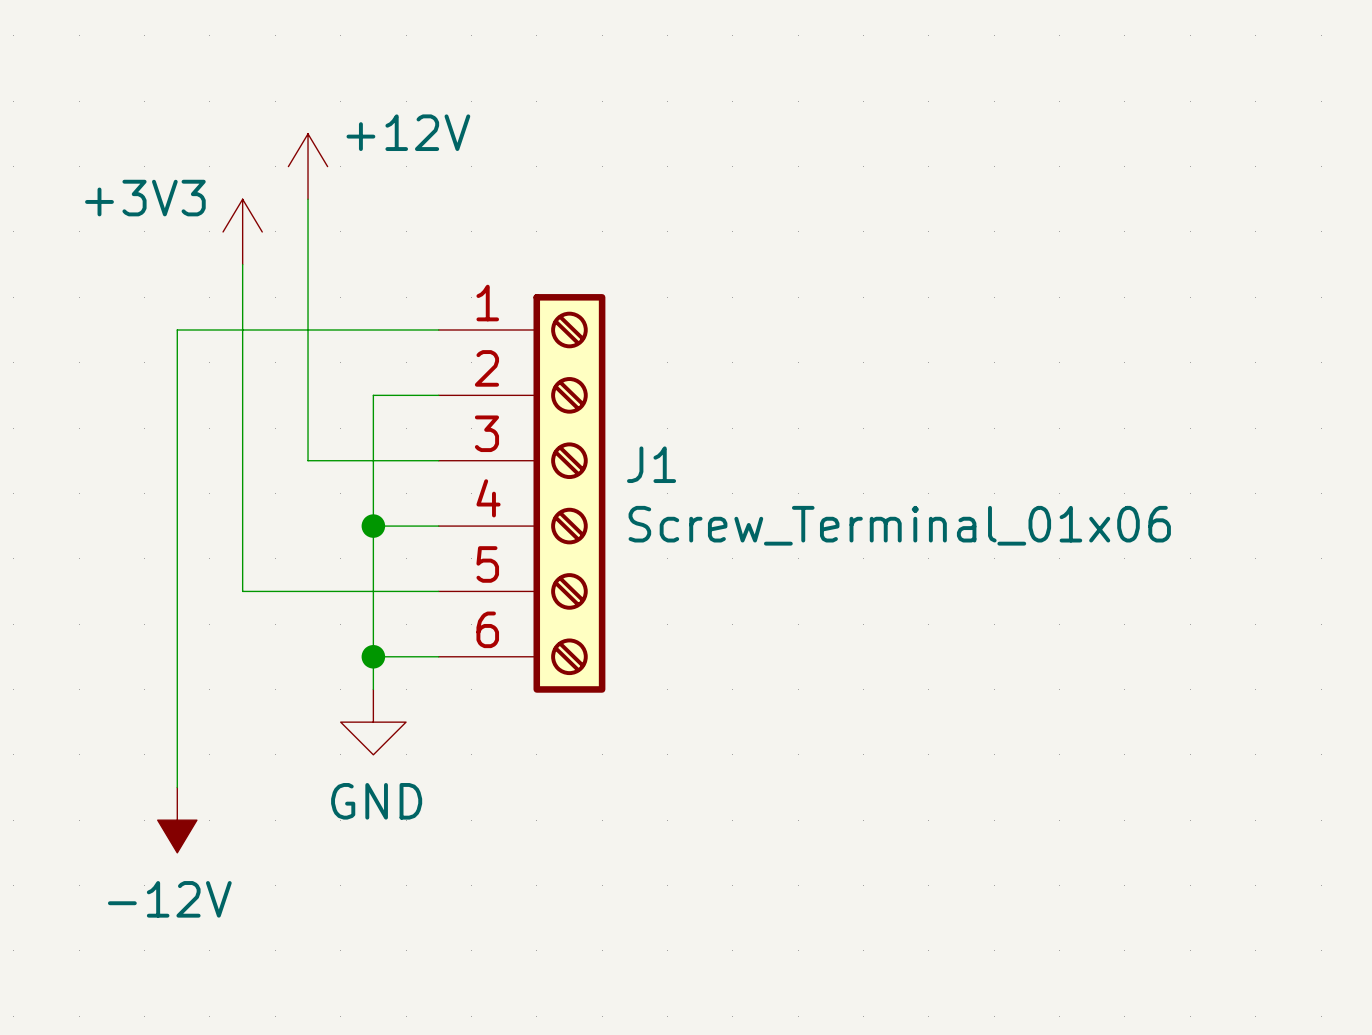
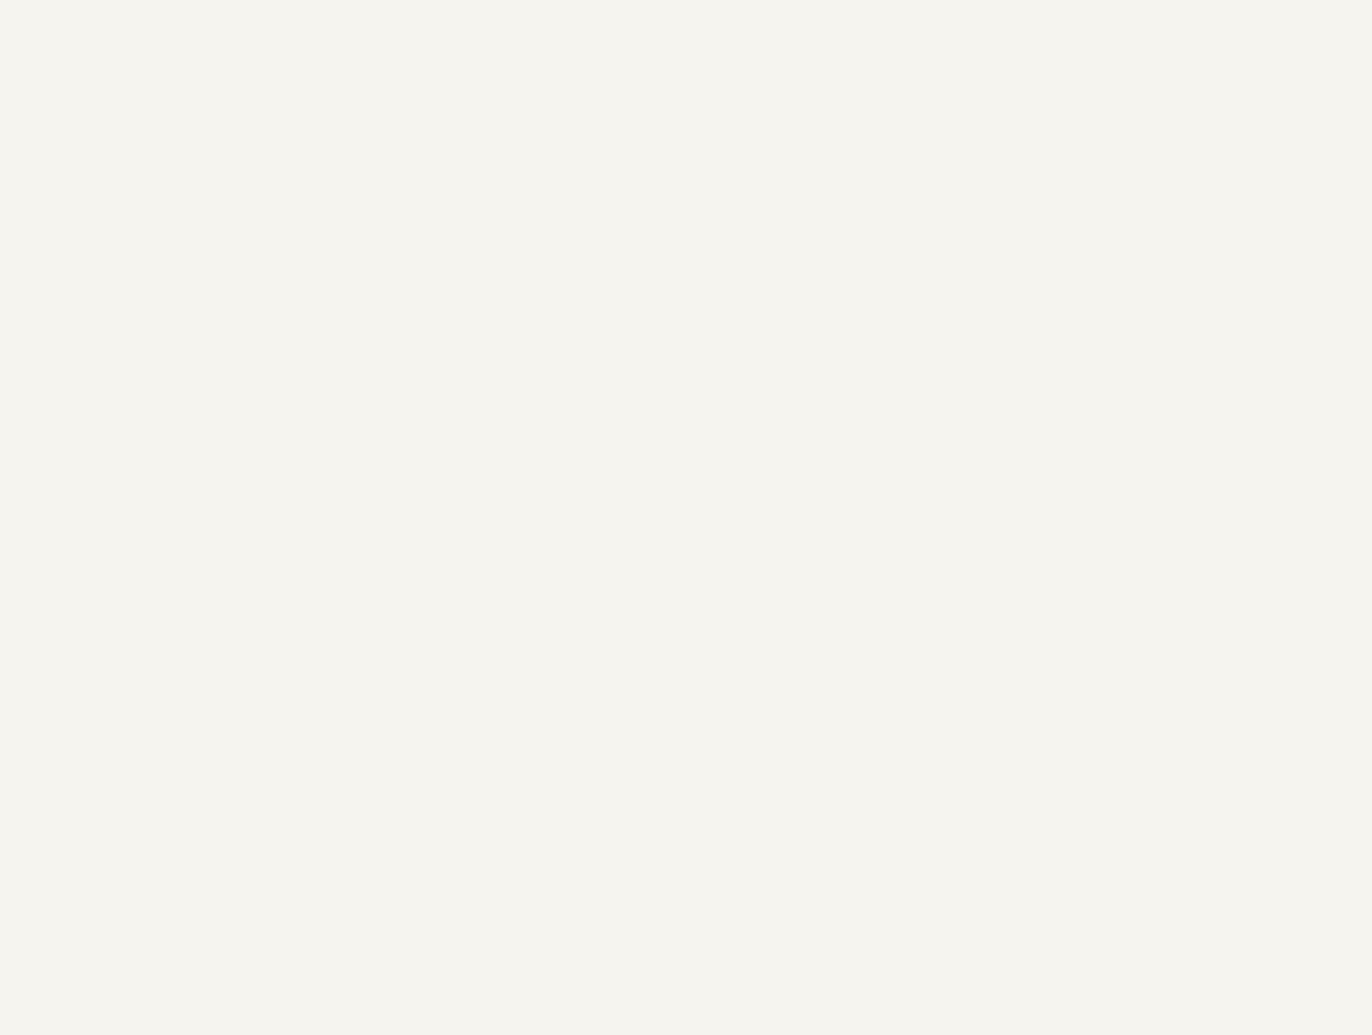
power symbol: +12V (308, 166) -> none
wire: (308, 199) (308, 460) (438, 460) -> none
power symbol: +3V3 (242, 231) -> none
wire: (242, 264) (242, 591) (438, 591) -> none
wire: (438, 330) (177, 330) (177, 787) -> none
wire: (438, 395) (373, 395) (373, 689) -> none
J1: Screw_Terminal_01x06 (522, 493) -> none
wire: (373, 526) (438, 526) -> none
junction: (373, 526) -> none
wire: (373, 656) (438, 656) -> none
junction: (373, 656) -> none
power symbol: GND (373, 722) -> none
power symbol: -12V (177, 820) -> none

